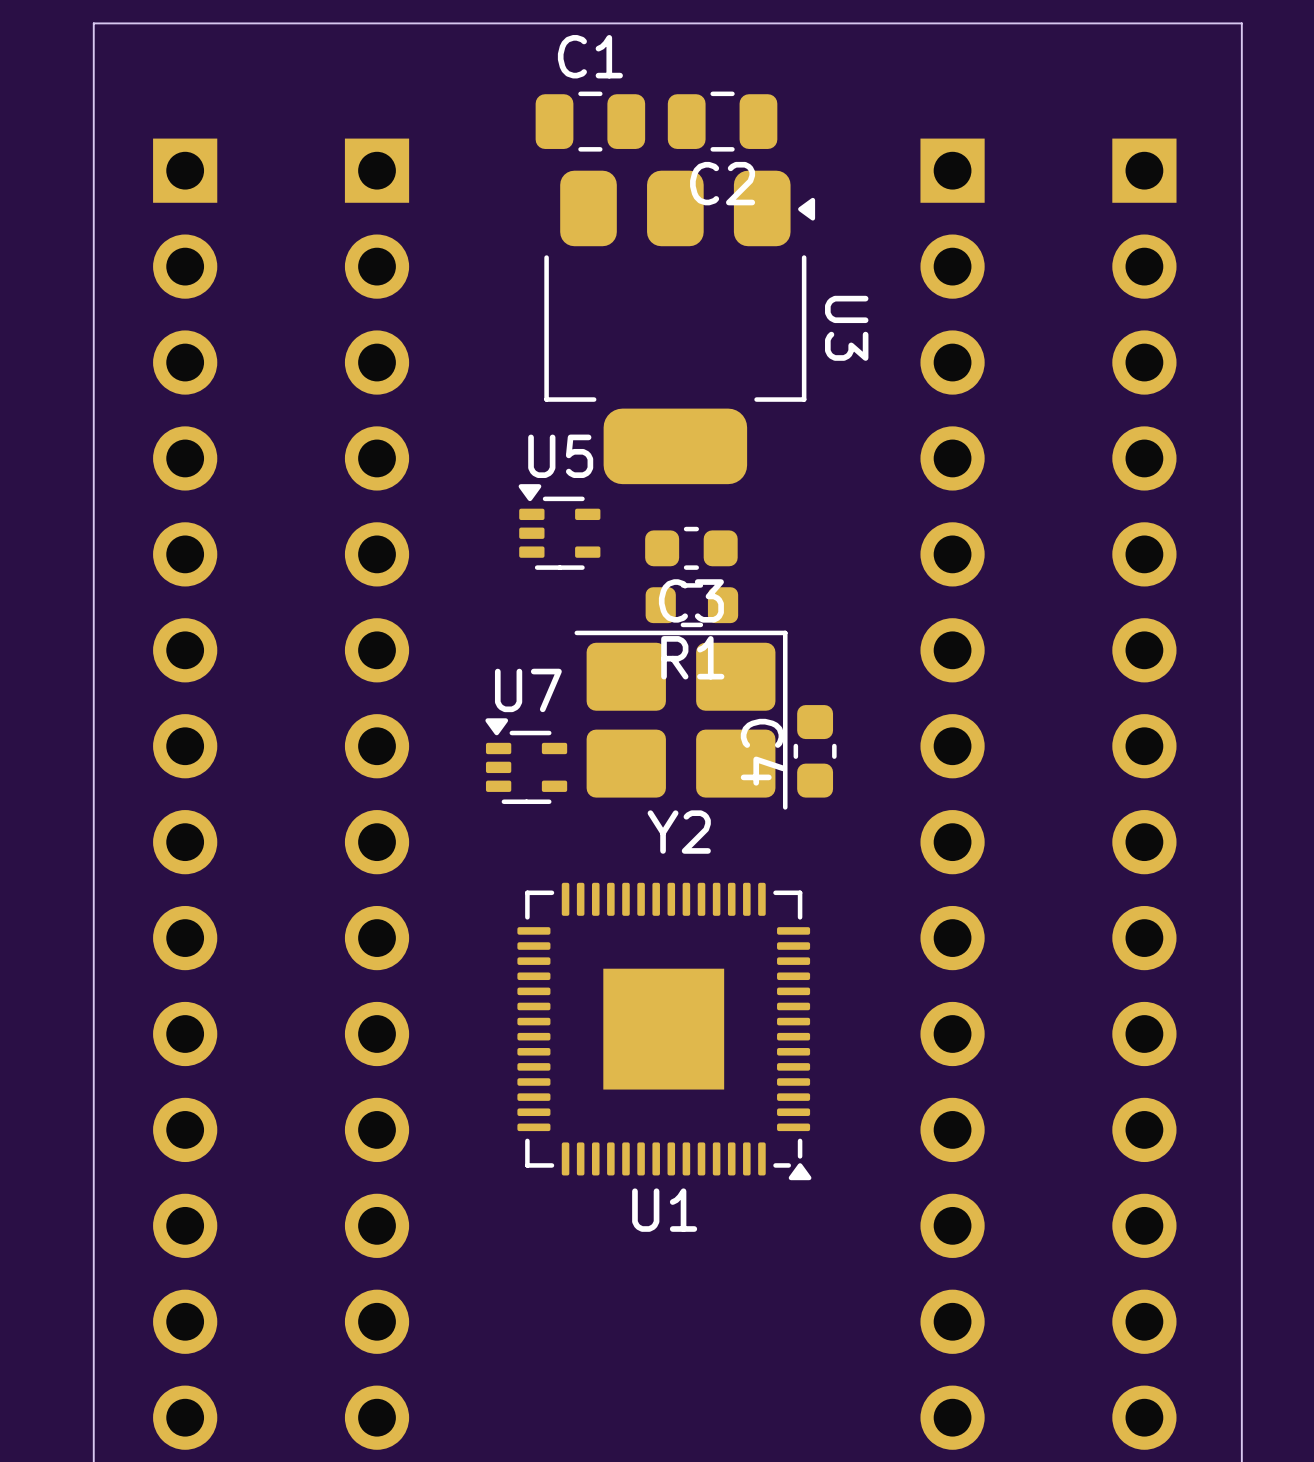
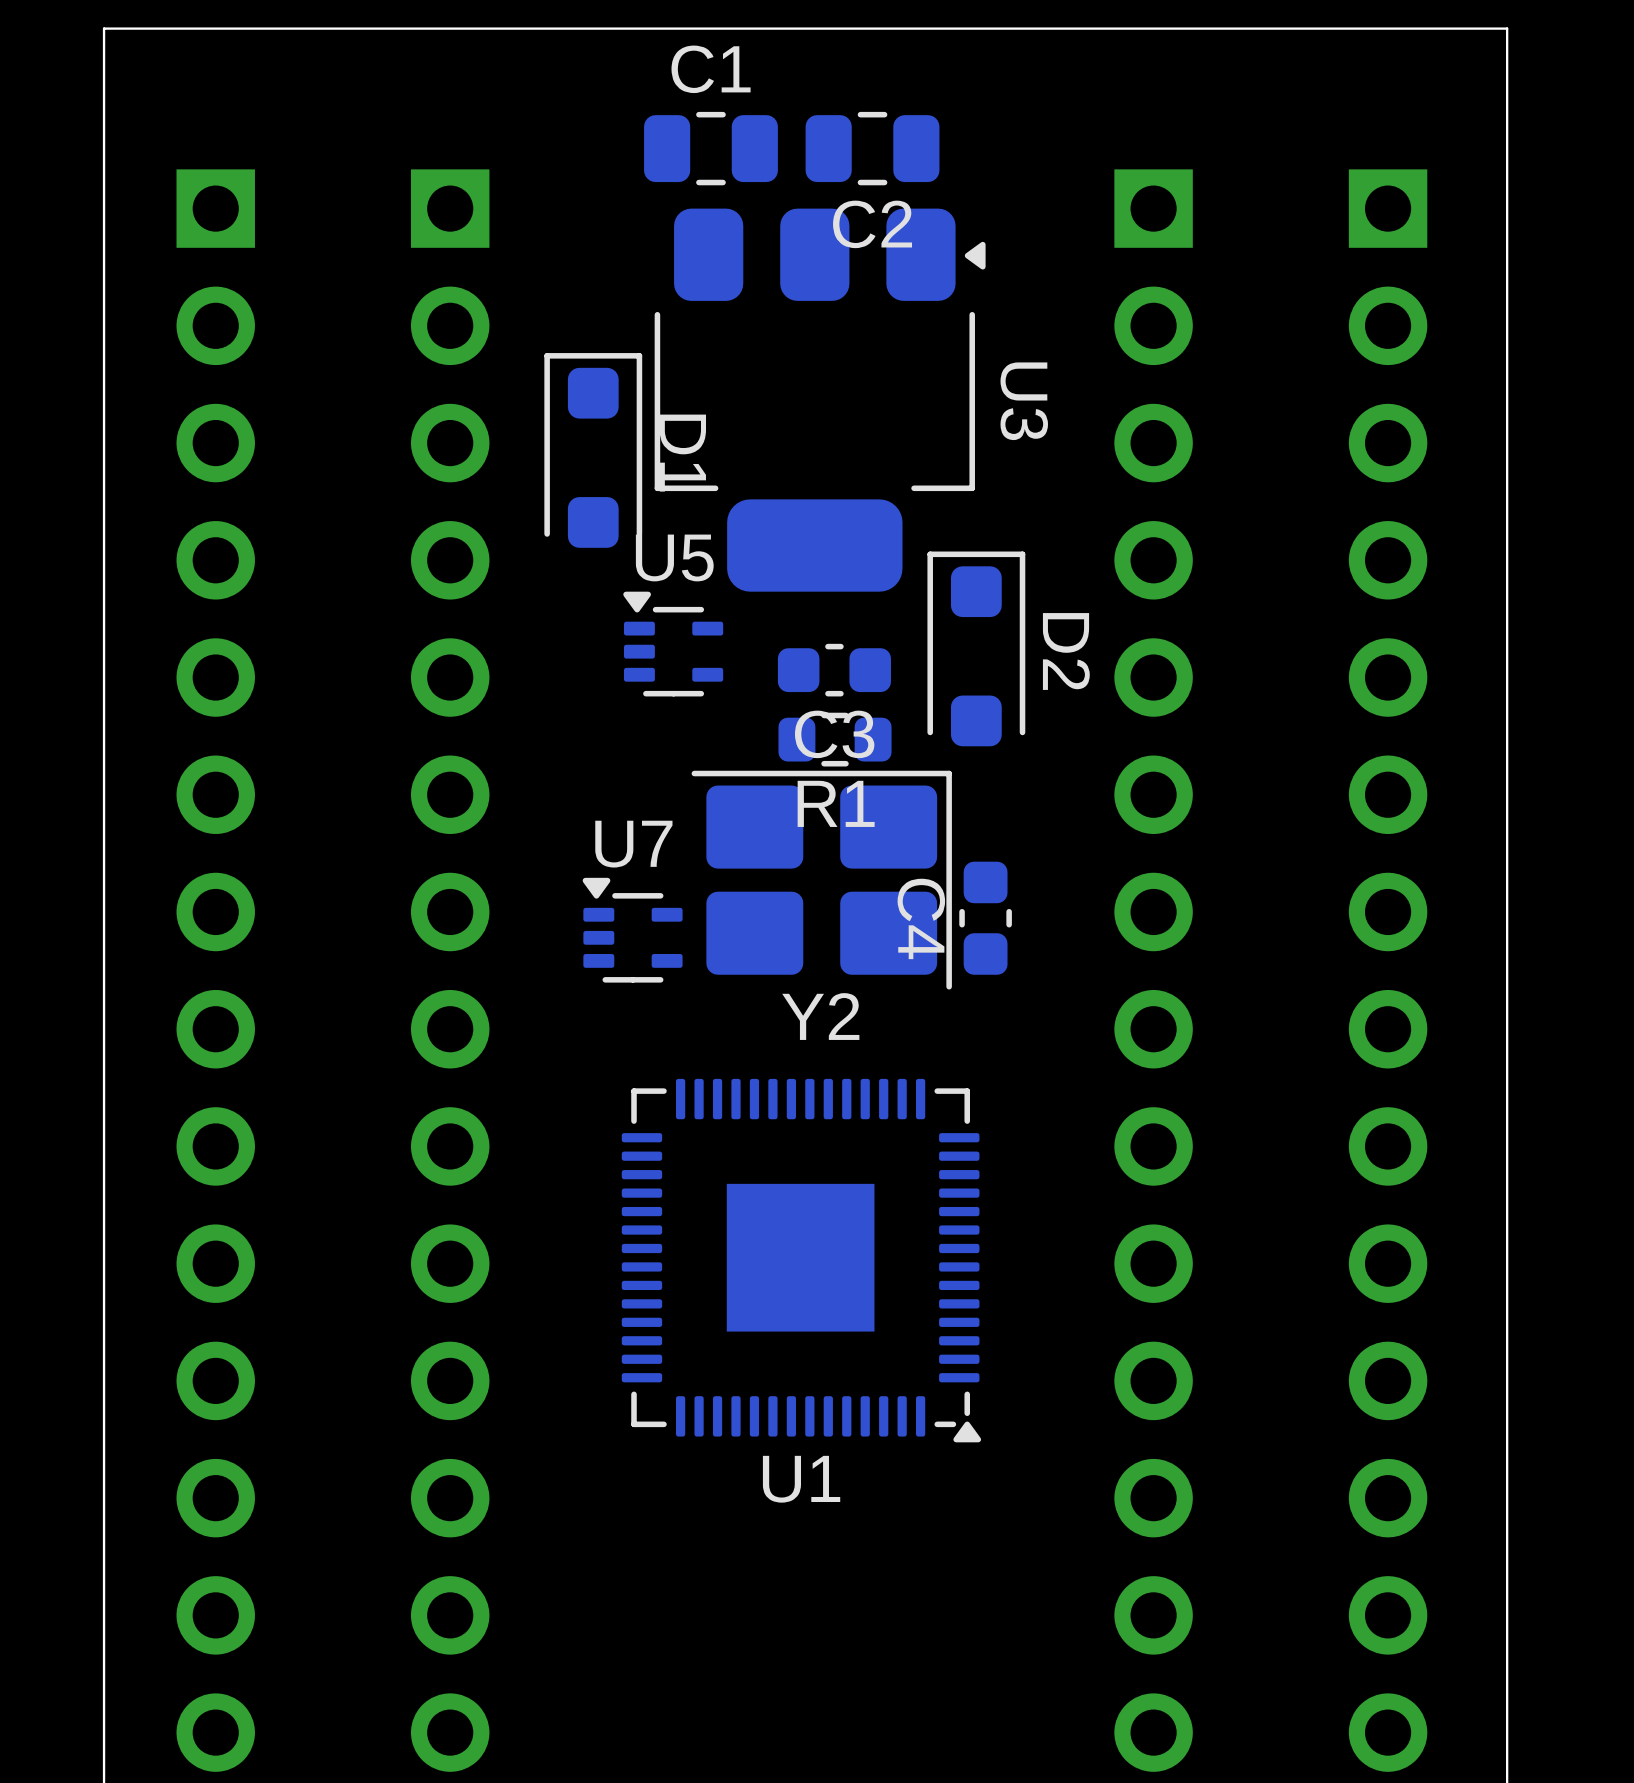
D1: none -> (593, 450)
D2: none -> (976, 648)

